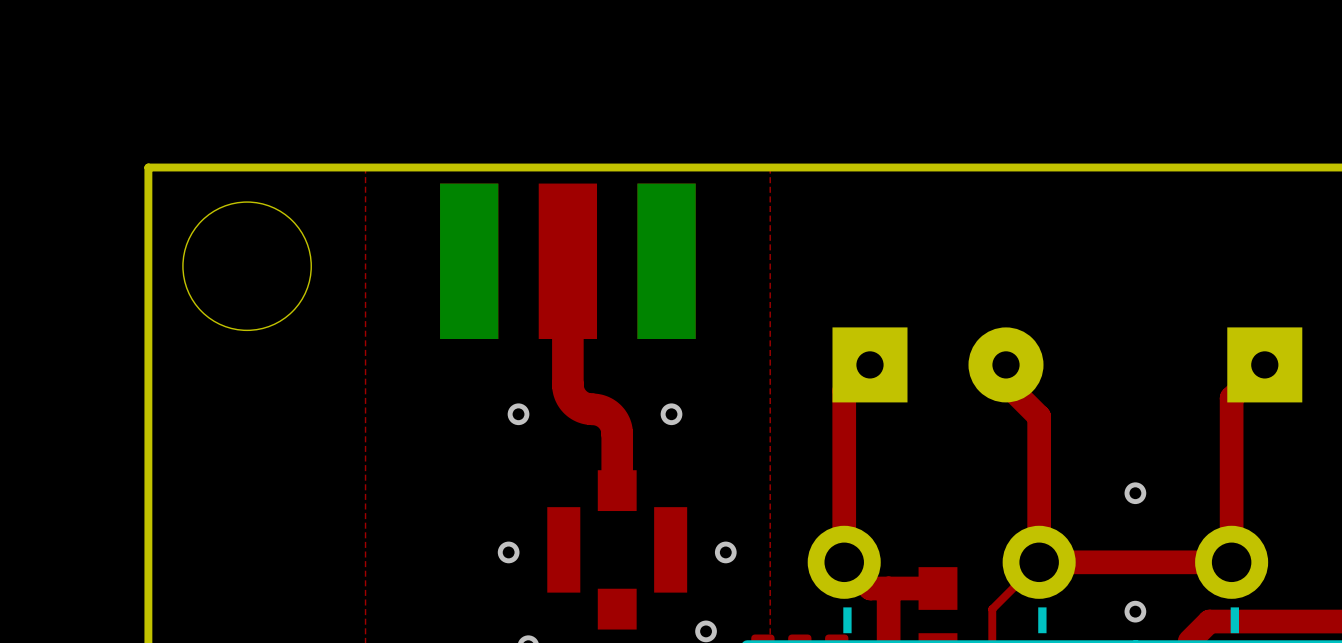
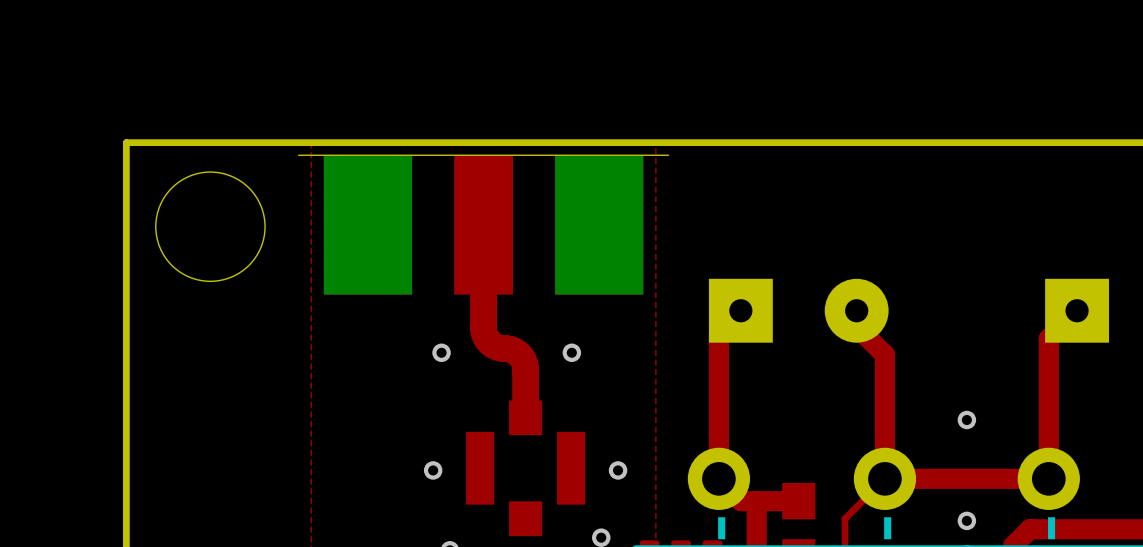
part footprint: [440, 183, 696, 339] -> [298, 155, 669, 295]

